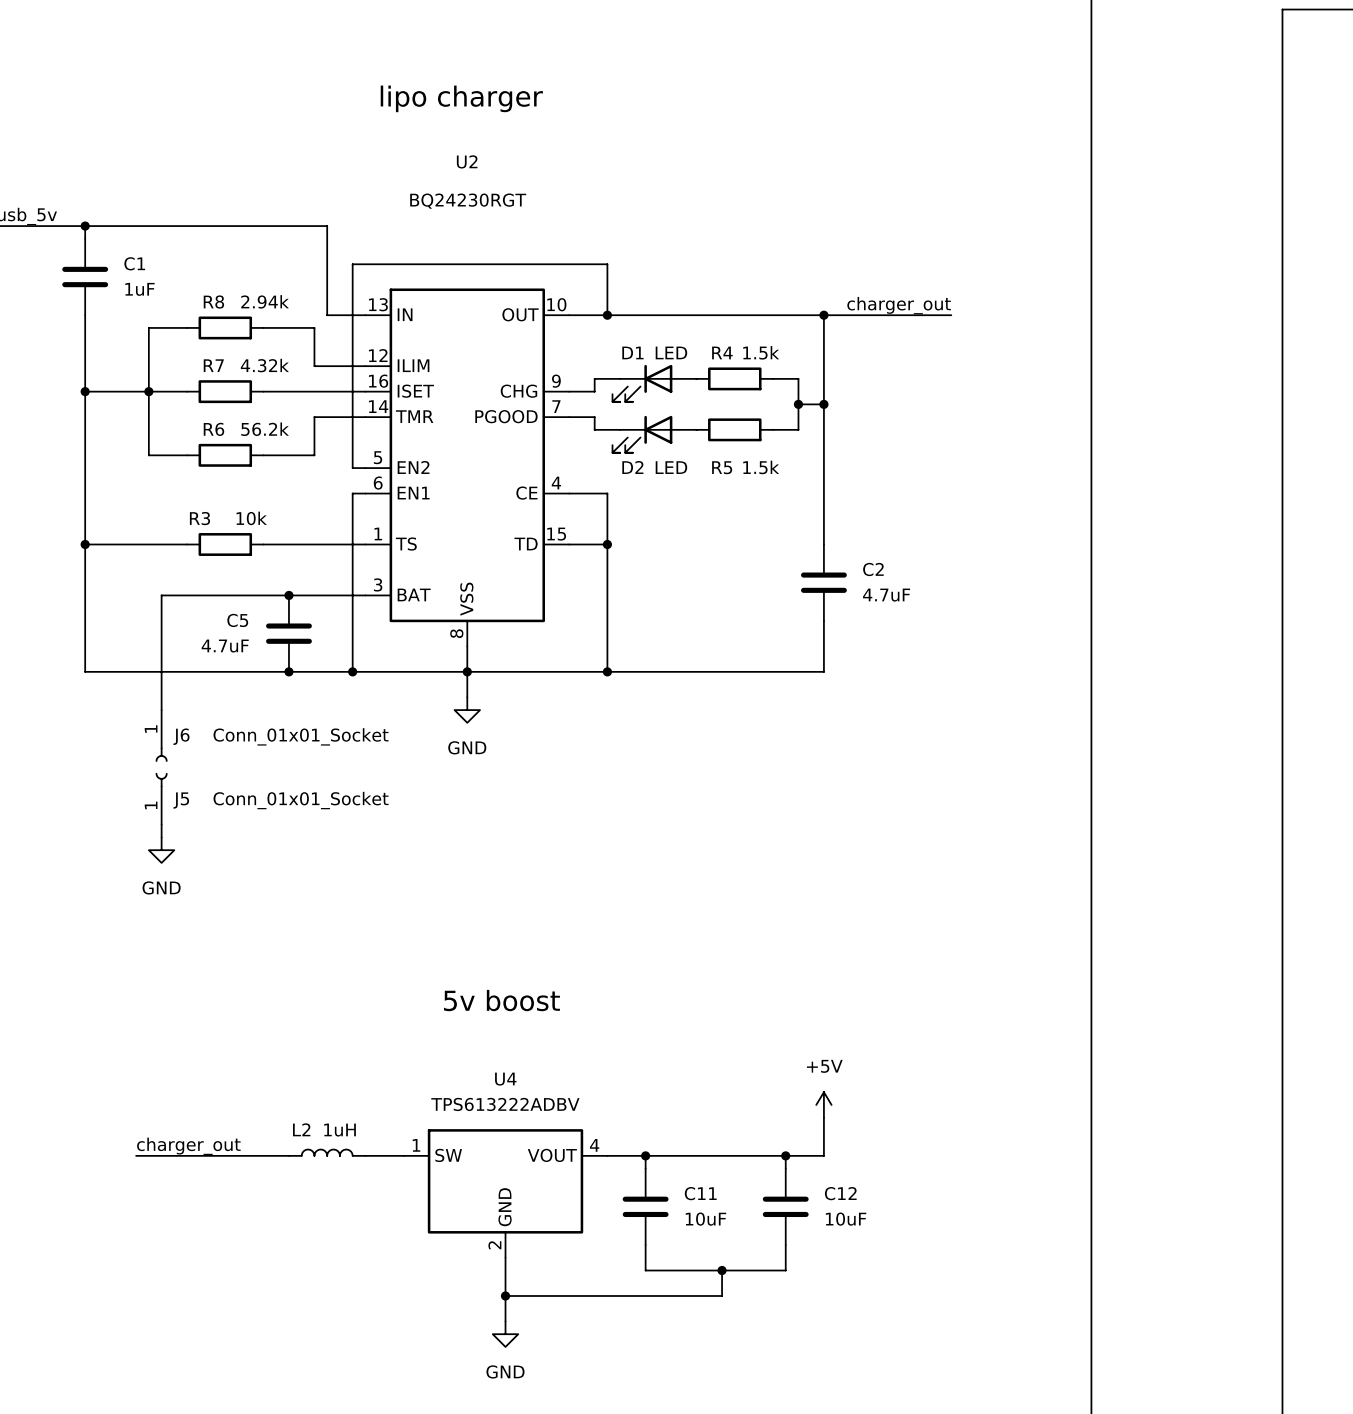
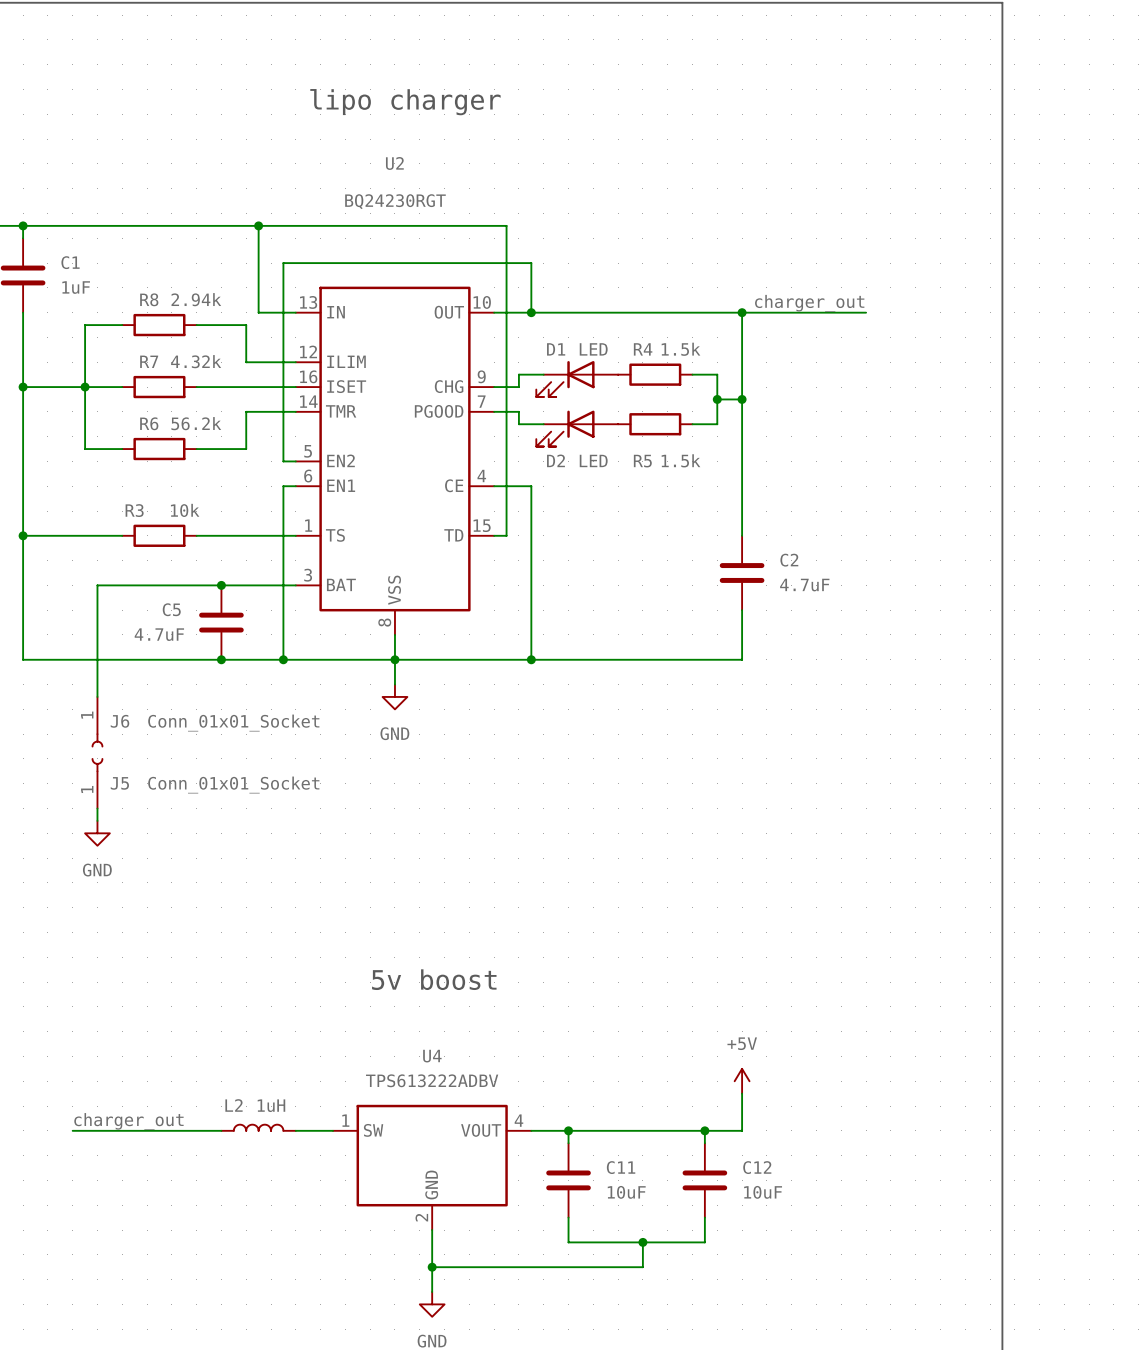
junction: none -> (258, 225)
wire: (581, 544) (607, 544) -> (506, 535) (506, 225) (258, 225)
junction: (607, 544) -> none

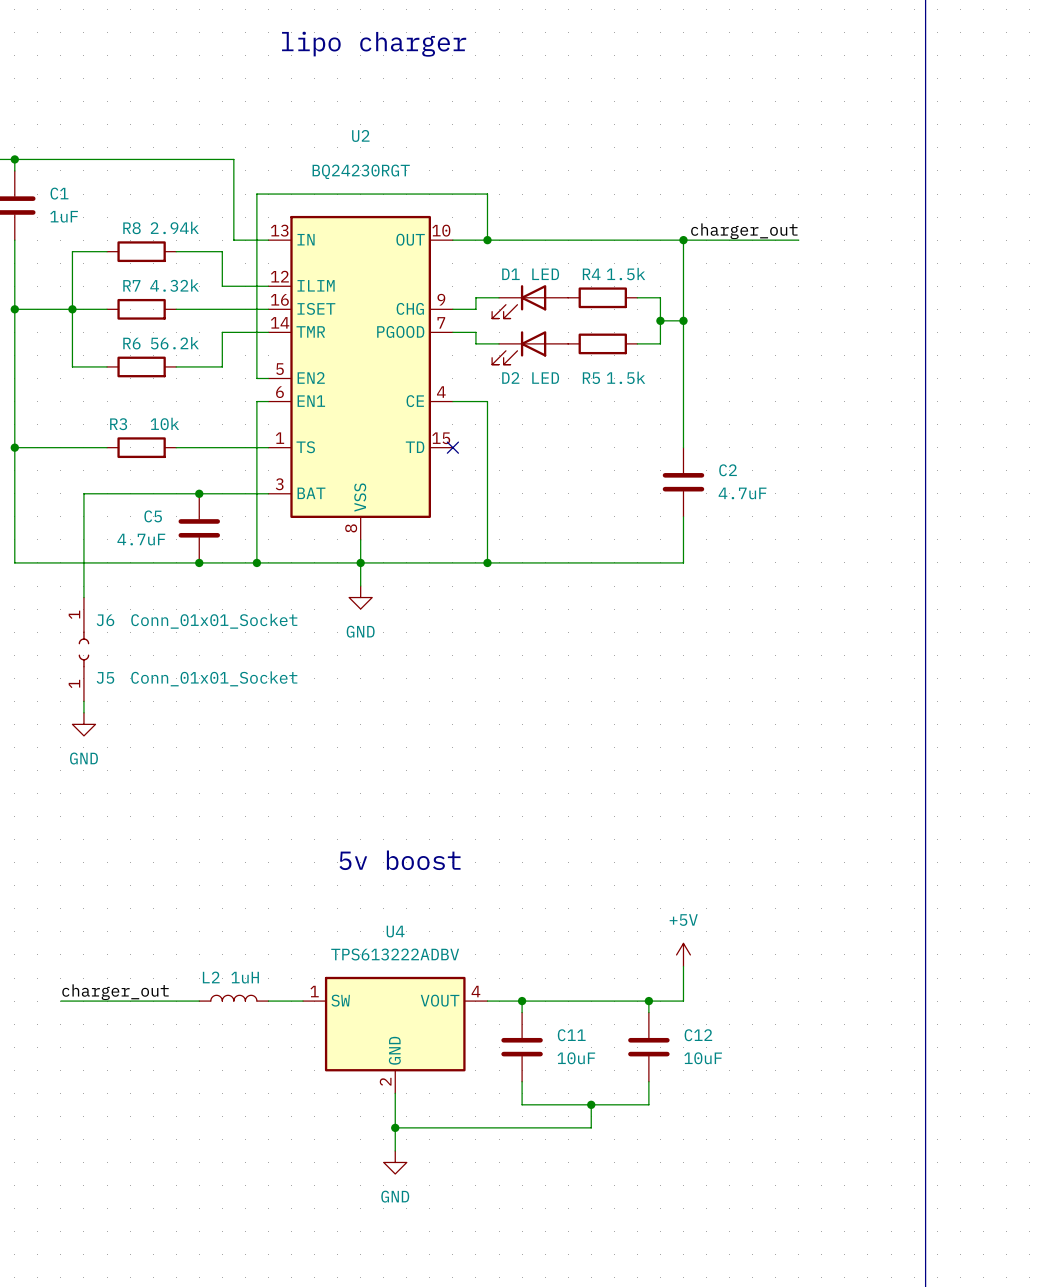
U2 name position: U2 (394, 163) -> U2 (360, 135)
U2 value position: BQ24230RGT (395, 201) -> BQ24230RGT (361, 171)
wire: (258, 225) (506, 225) (506, 535) (494, 535) -> none
junction: (258, 225) -> none
no-connect mark: none -> (452, 447)

